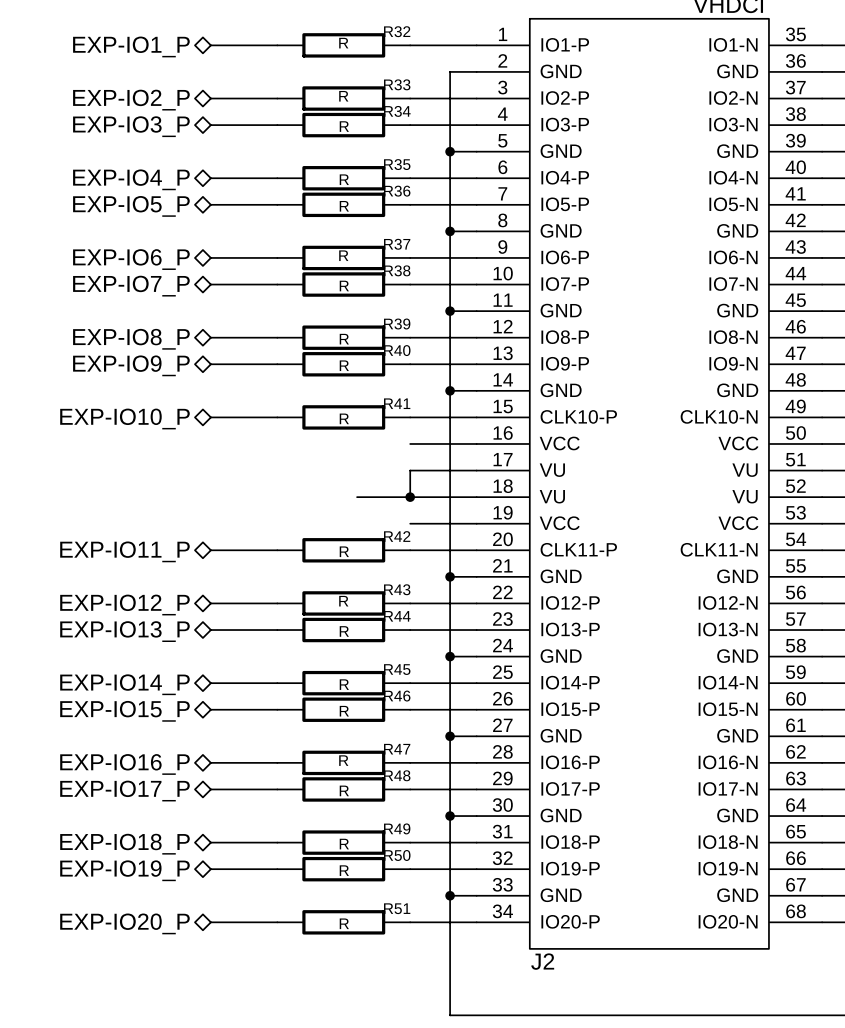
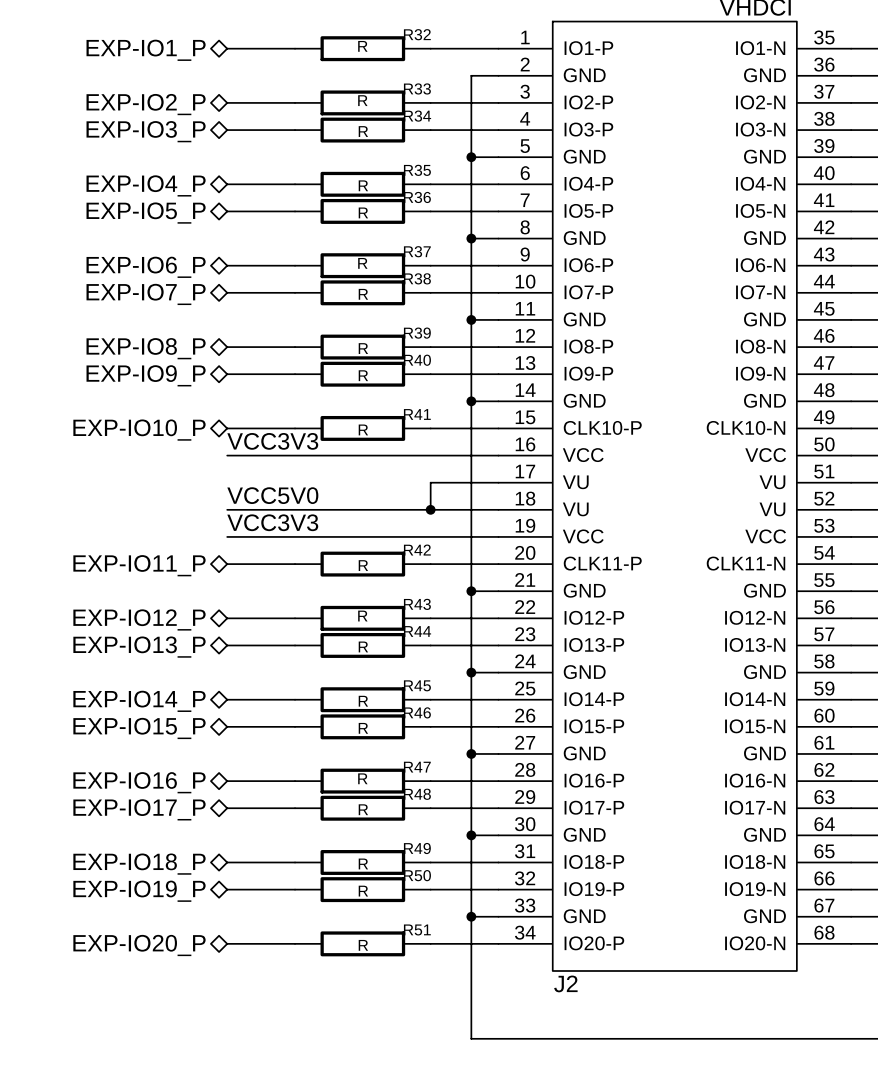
label: none -> VCC3V3 (272, 441)
wire: none -> (227, 455) (430, 455)
label: none -> VCC5V0 (272, 495)
wire: none -> (227, 509) (376, 509)
label: none -> VCC3V3 (272, 522)
wire: none -> (227, 536) (430, 536)

